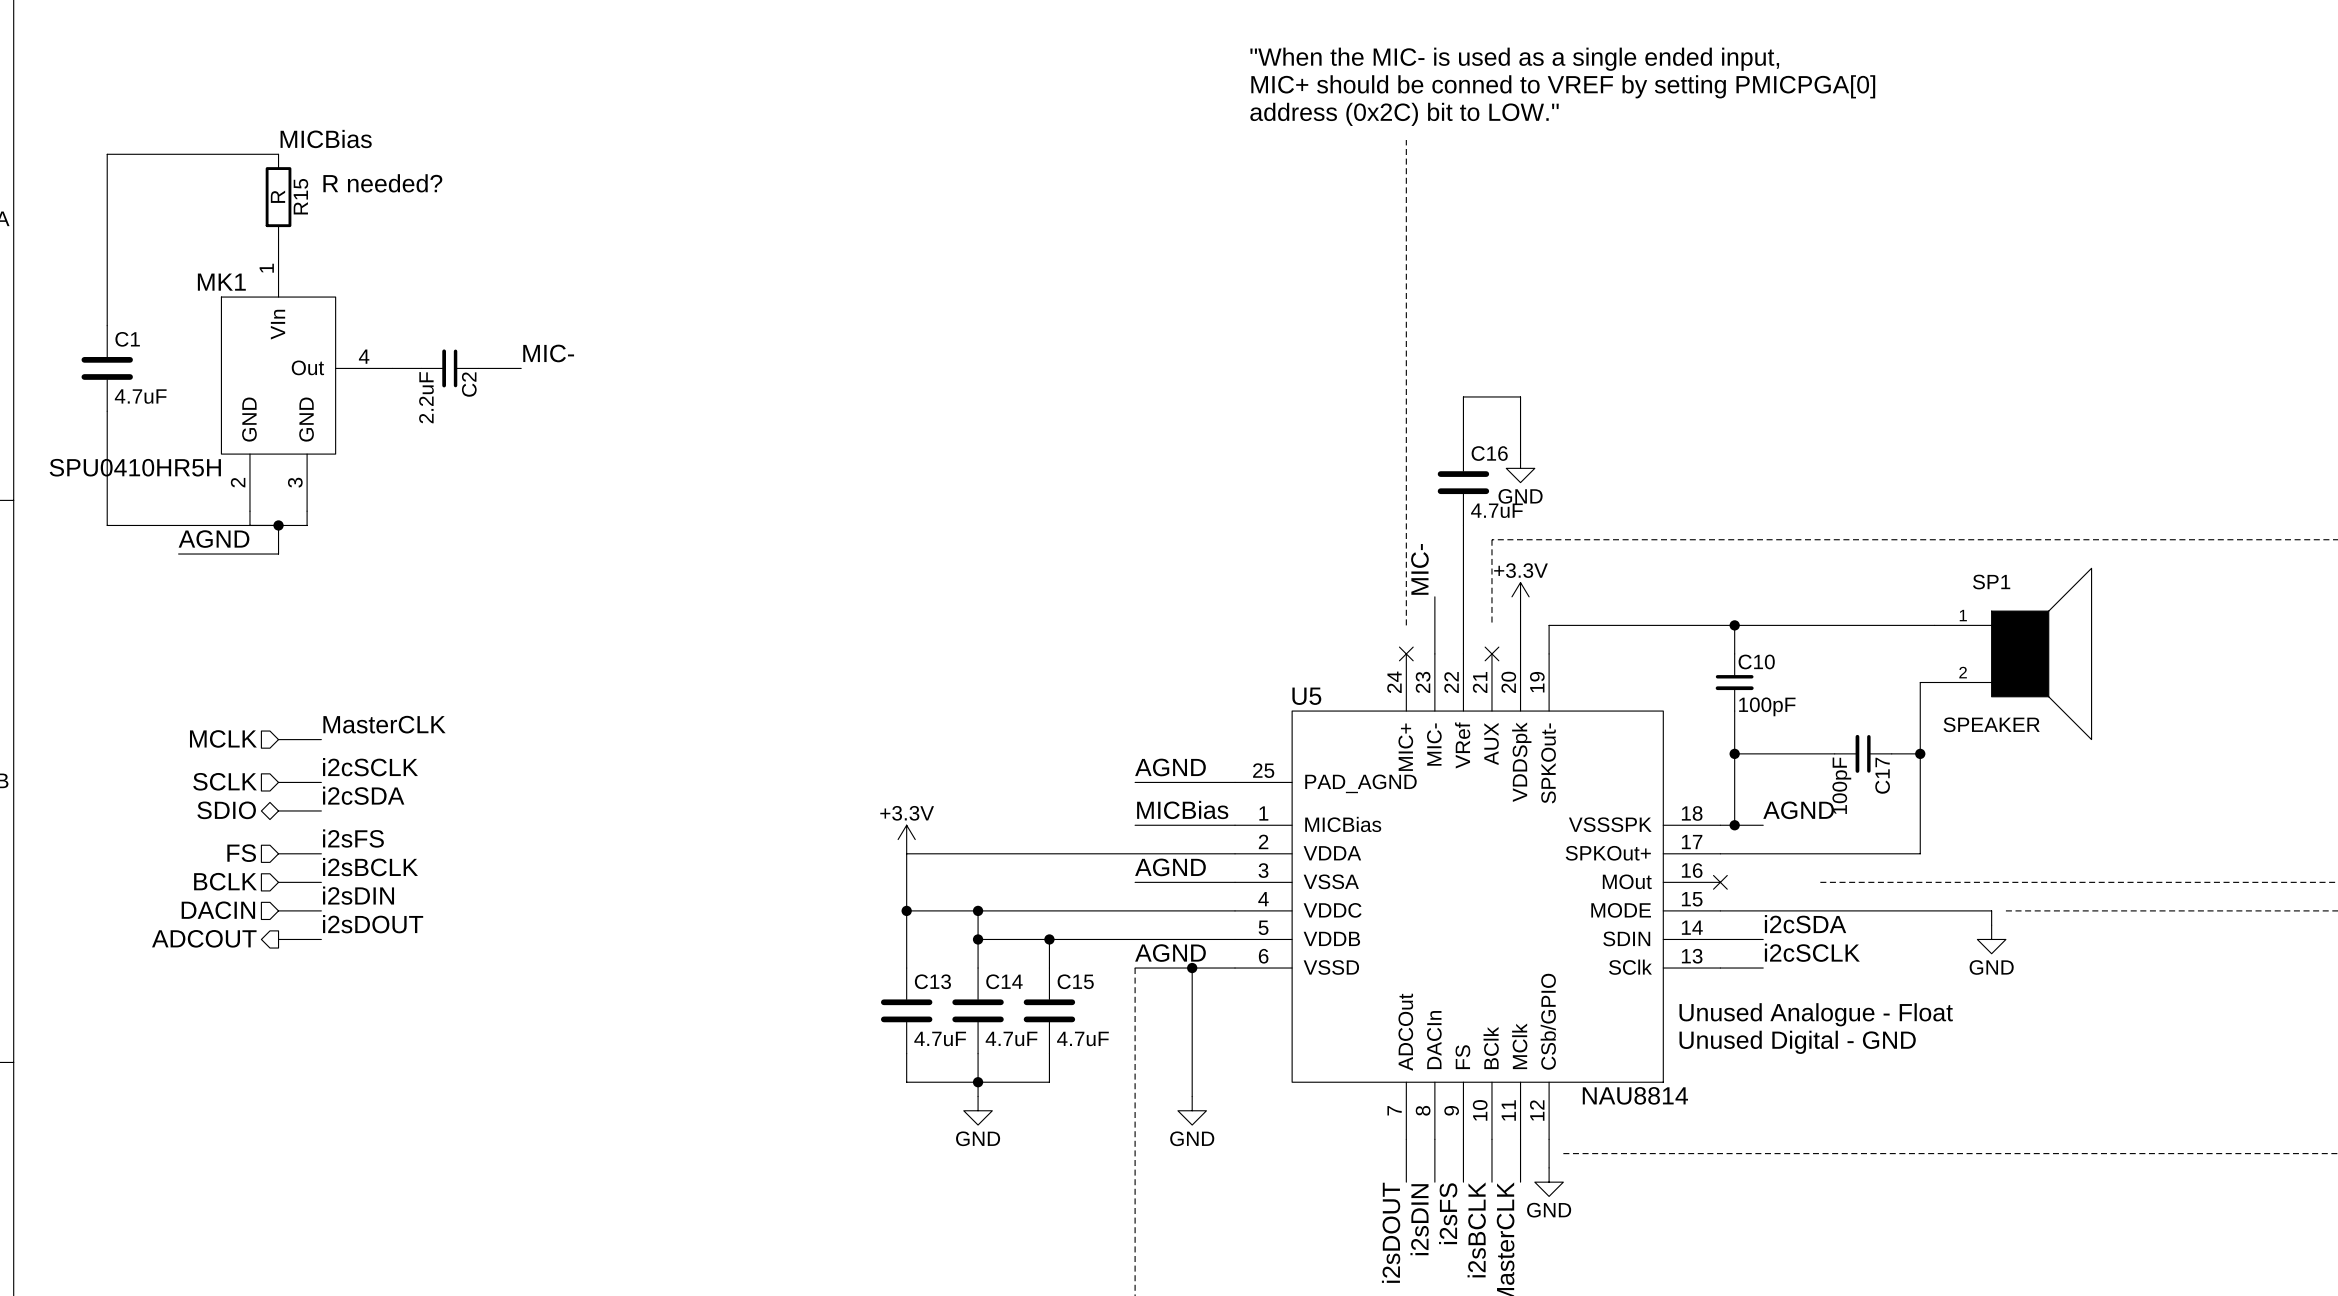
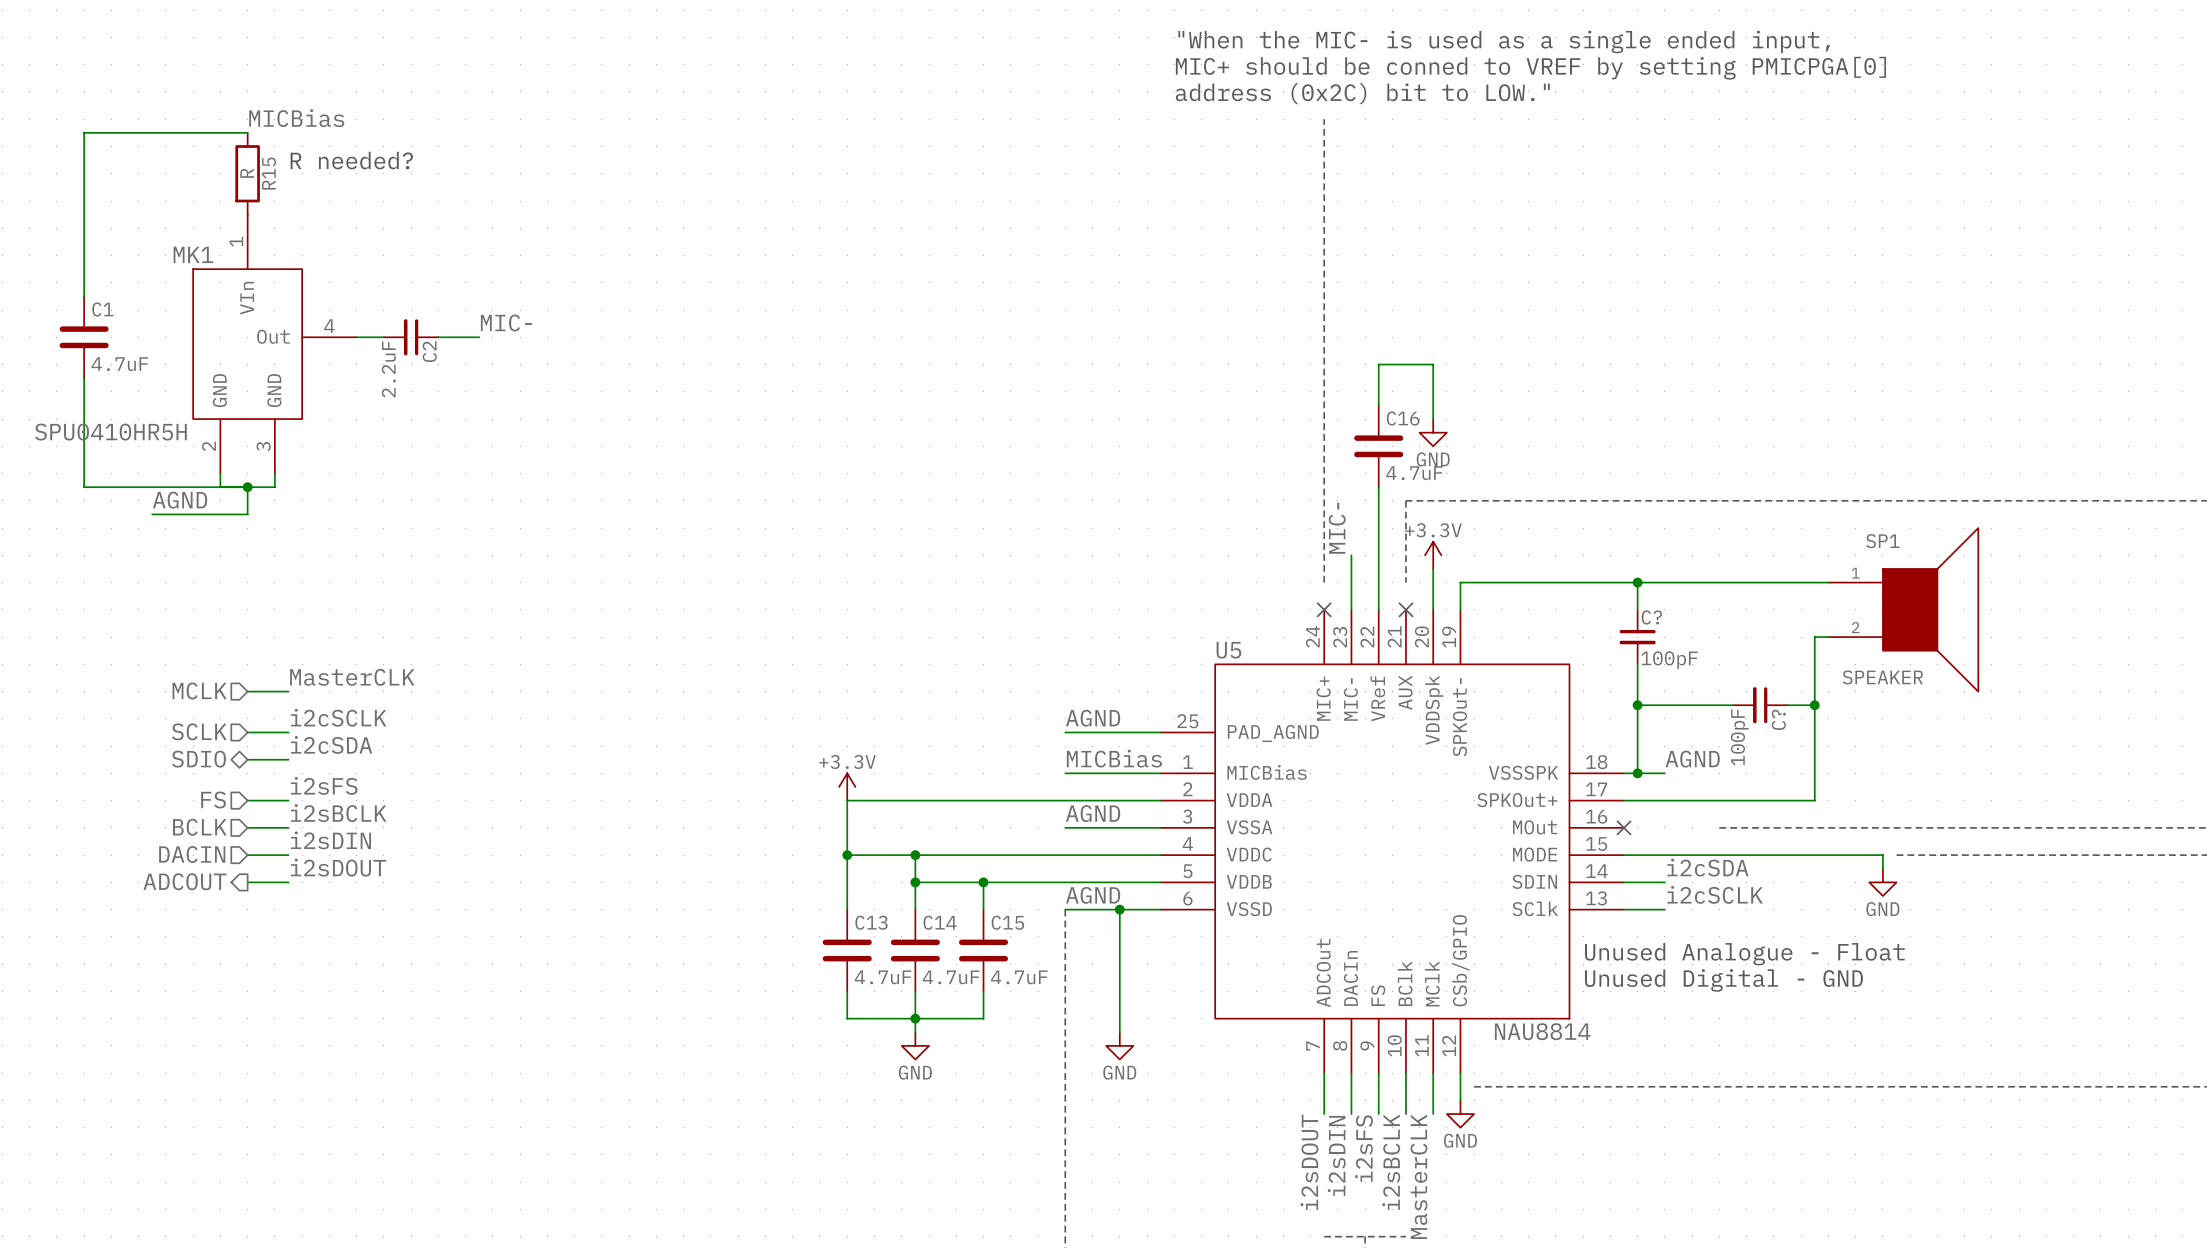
C10 name: C10 (1756, 661) -> C? (1651, 617)
C17 name: C17 (1882, 775) -> C? (1778, 719)

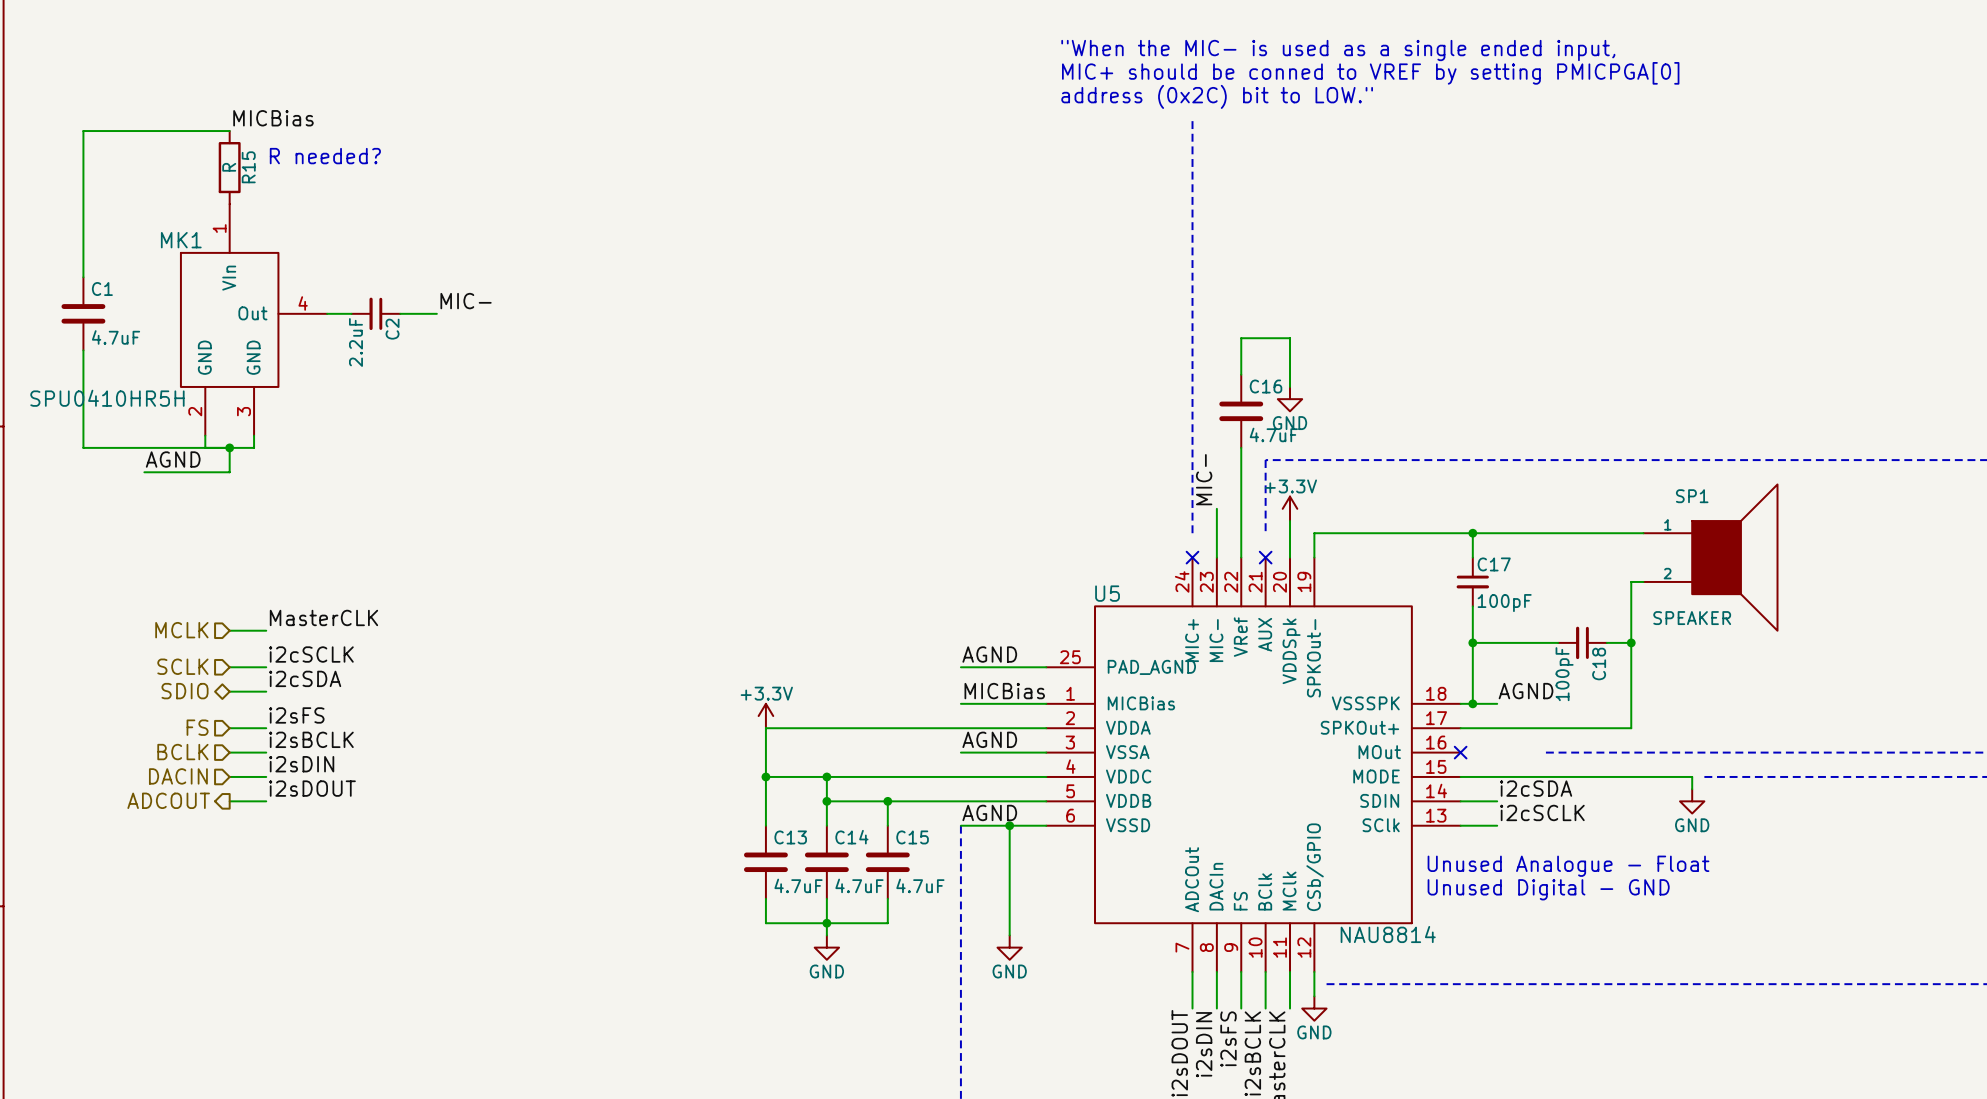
C? name: C? (1651, 617) -> C17 (1494, 564)
C? name: C? (1778, 719) -> C18 (1599, 664)

